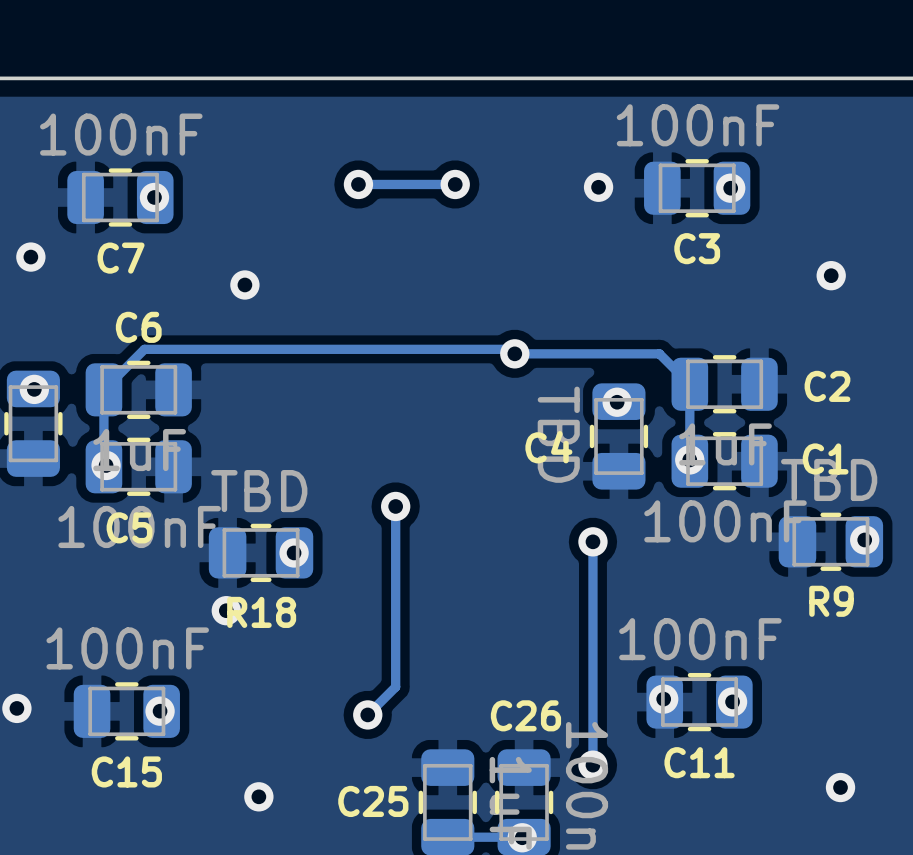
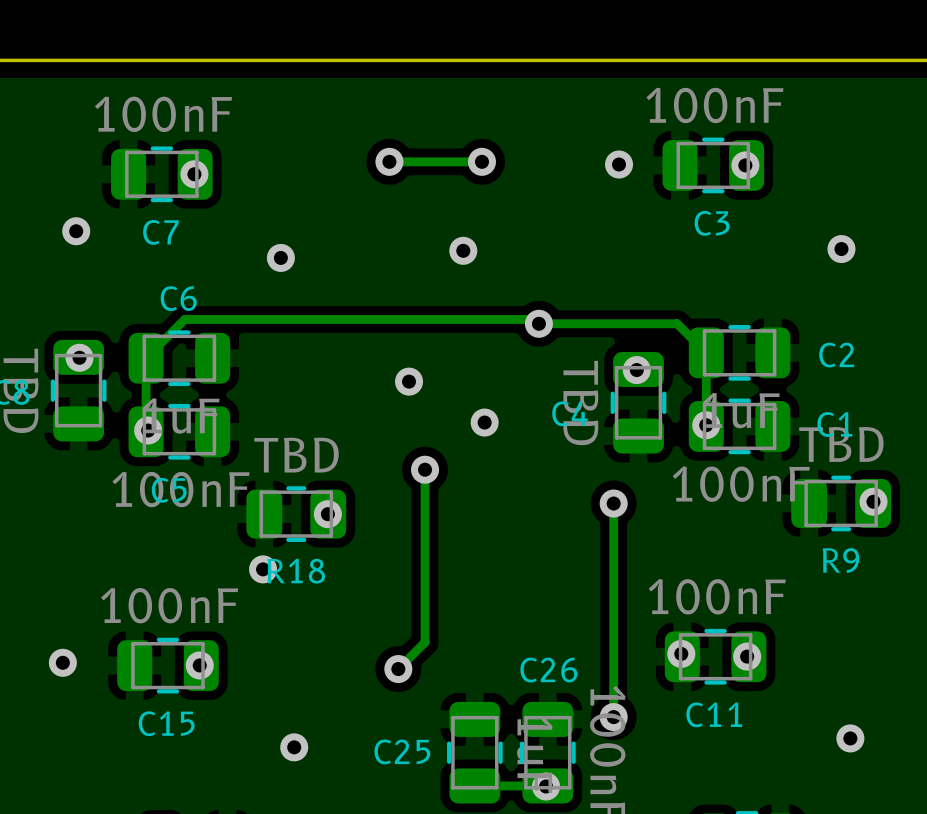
via: none -> (463, 250)
via: none -> (409, 381)
via: none -> (484, 422)

